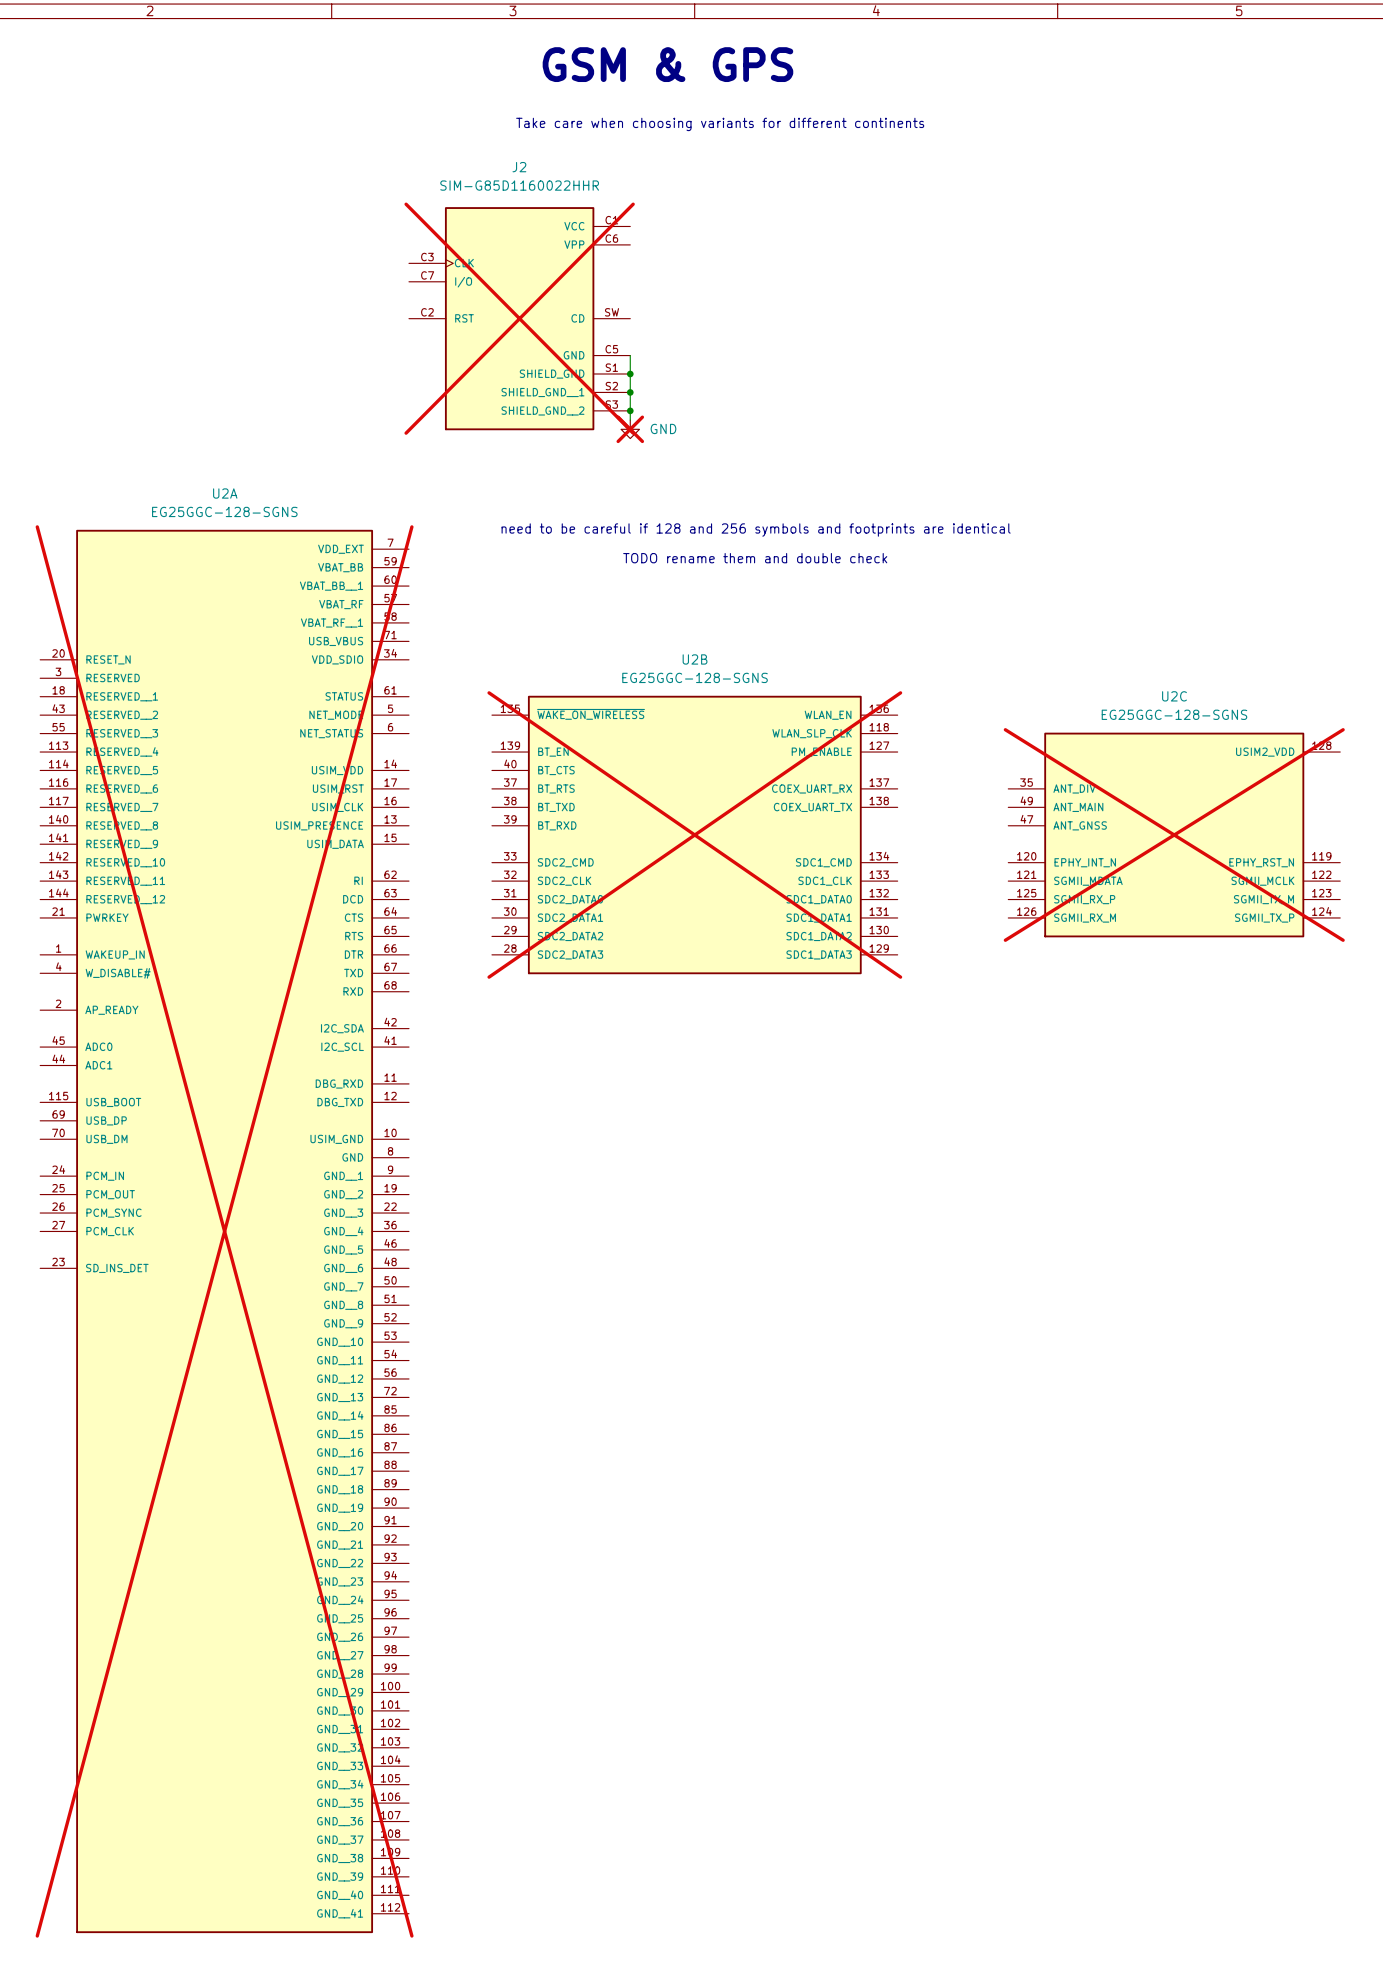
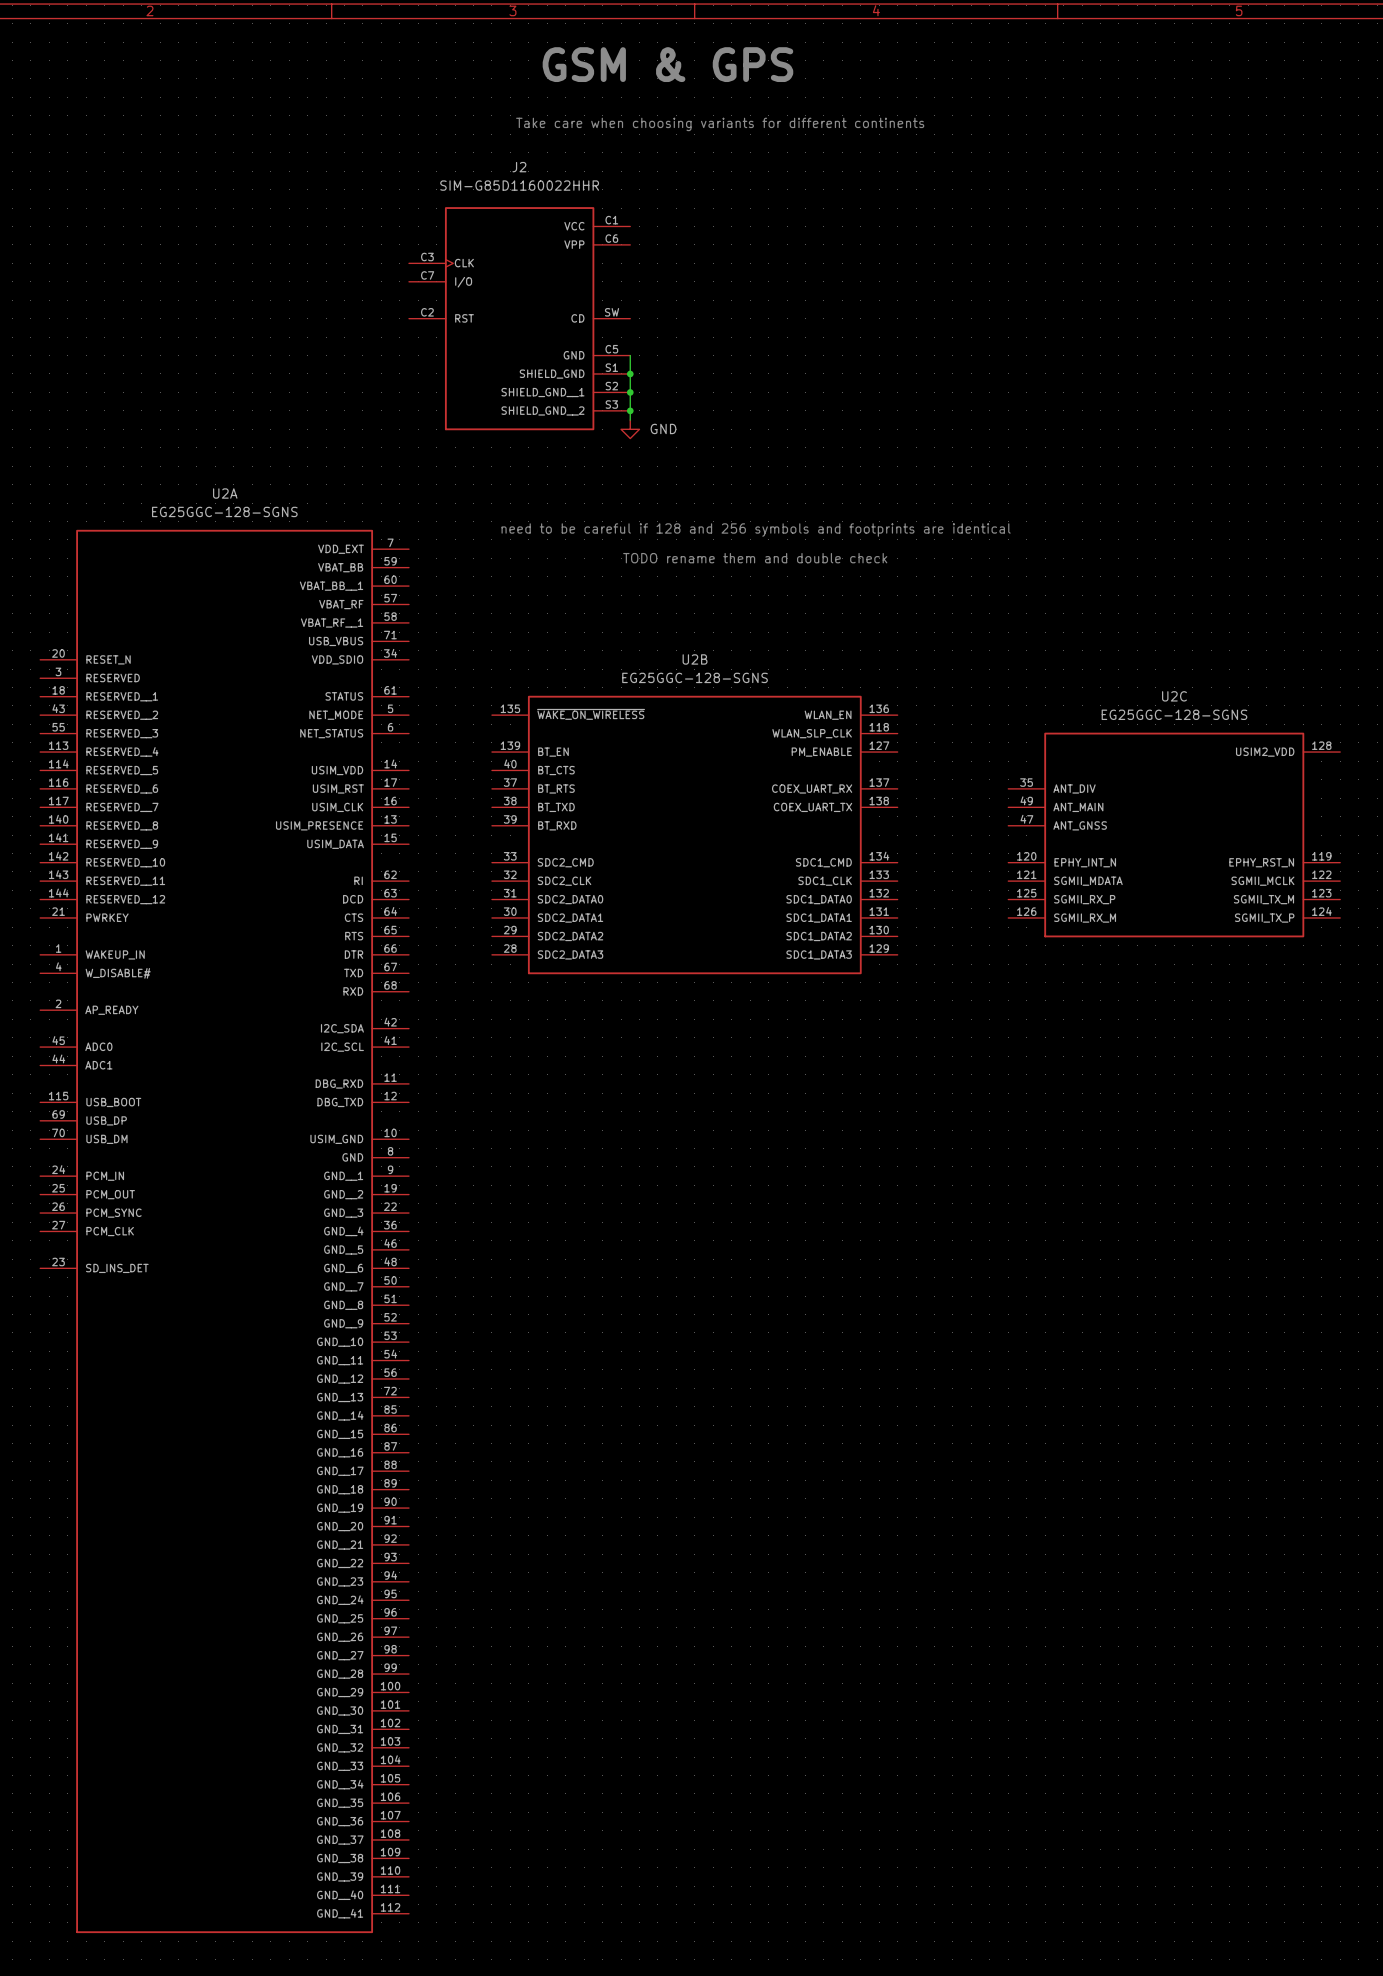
J2 do-not-place cross: (519, 318) -> none
power symbol do-not-place cross: (630, 429) -> none
U2B do-not-place cross: (694, 835) -> none
U2C do-not-place cross: (1174, 835) -> none
U2A do-not-place cross: (224, 1231) -> none

